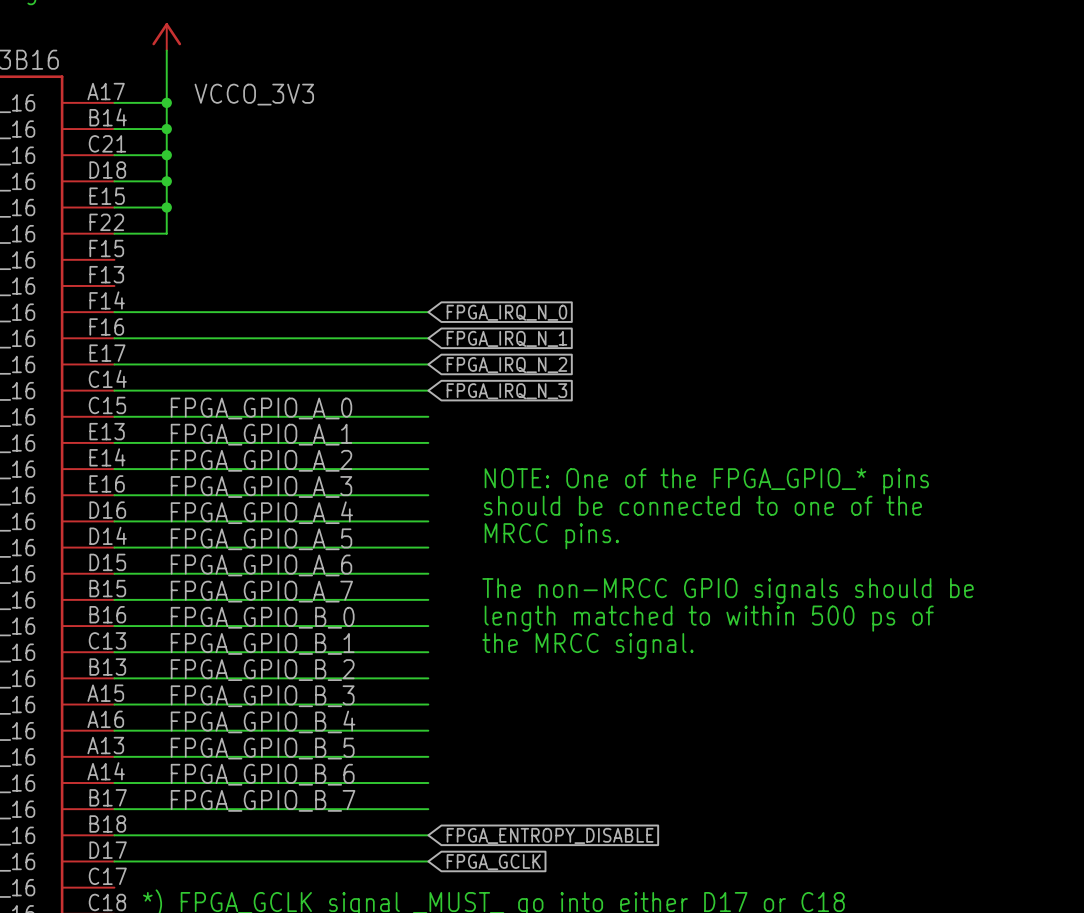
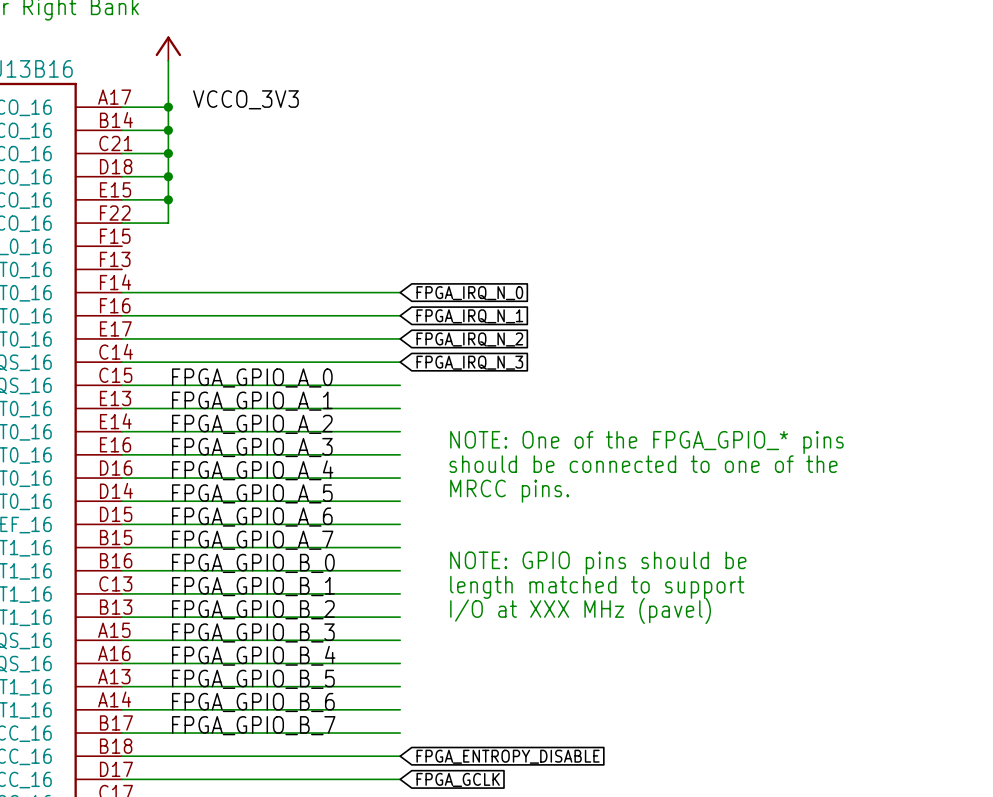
text: The non-MRCC GPIO signals should be (728, 591) -> none
text: length matched to within 500 ps of (709, 618) -> NOTE: GPIO pins should be (598, 563)
text: the MRCC signal. (587, 646) -> length matched to support (597, 587)
text: none -> I/O at XXX MHz (pavel) (580, 610)

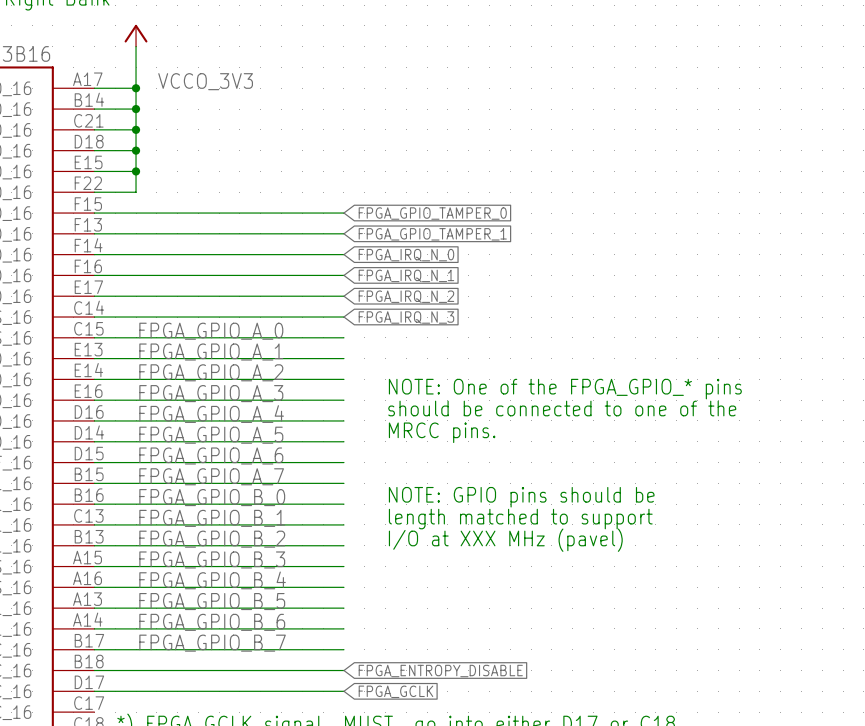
wire: none -> (94, 213) (343, 213)
global label: none -> FPGA_GPIO_TAMPER_0 (432, 213)
wire: none -> (94, 233) (343, 233)
global label: none -> FPGA_GPIO_TAMPER_1 (432, 234)

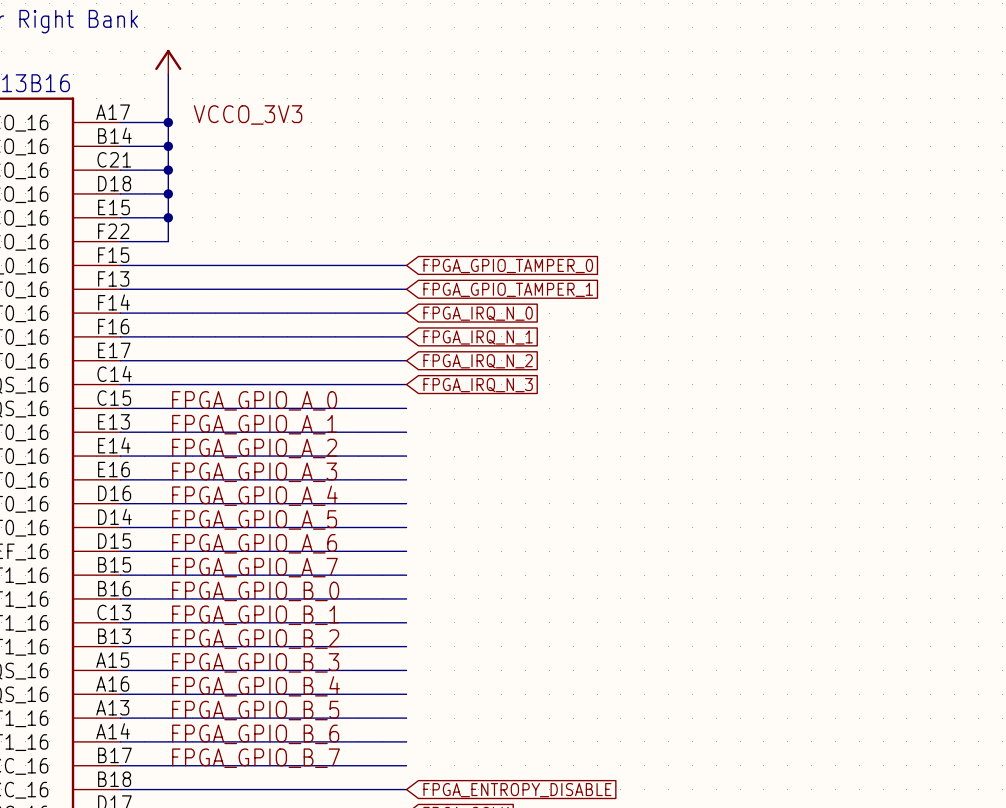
text: NOTE: One of the FPGA_GPIO_* pins (565, 389) -> none
text: should be connected to one of the (562, 408) -> none
text: MRCC pins. (442, 432) -> none
text: NOTE: GPIO pins should be (521, 497) -> none
text: length matched to support (520, 519) -> none
text: I/O at XXX MHz (pavel) (505, 540) -> none

